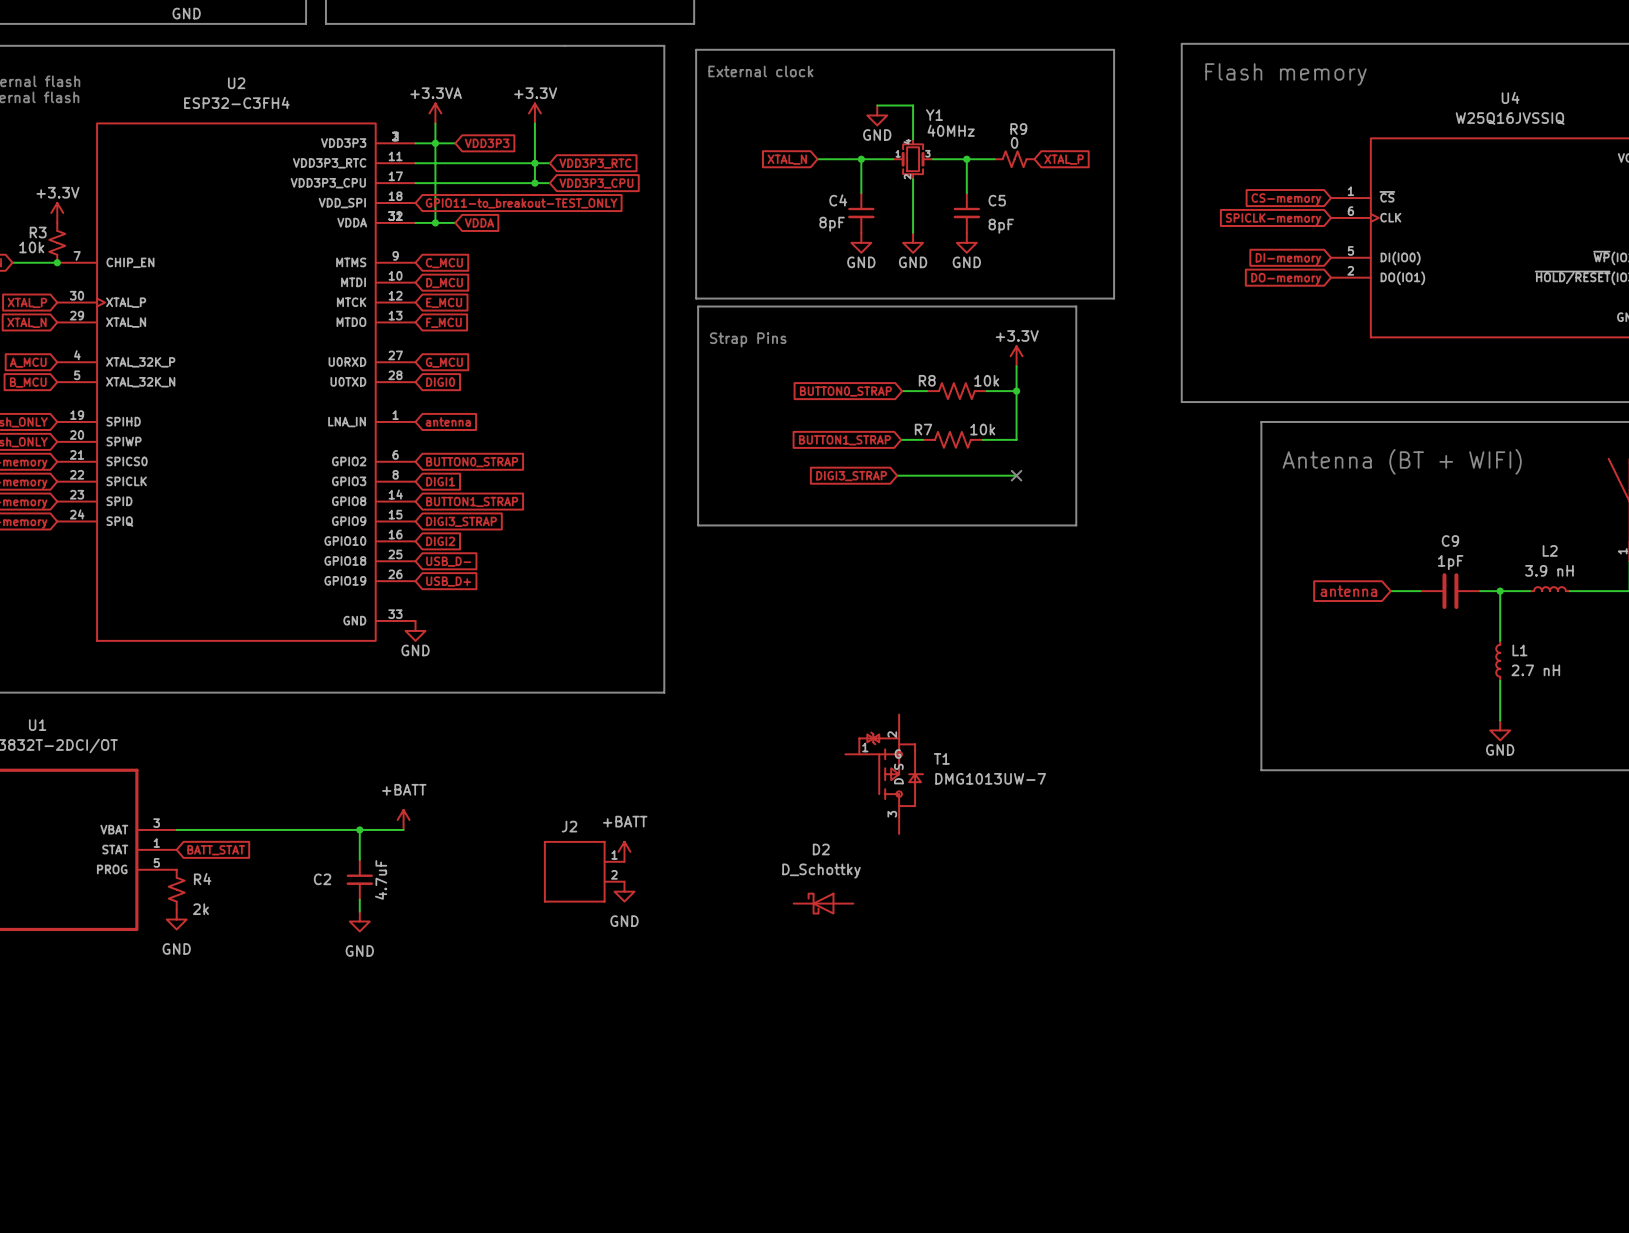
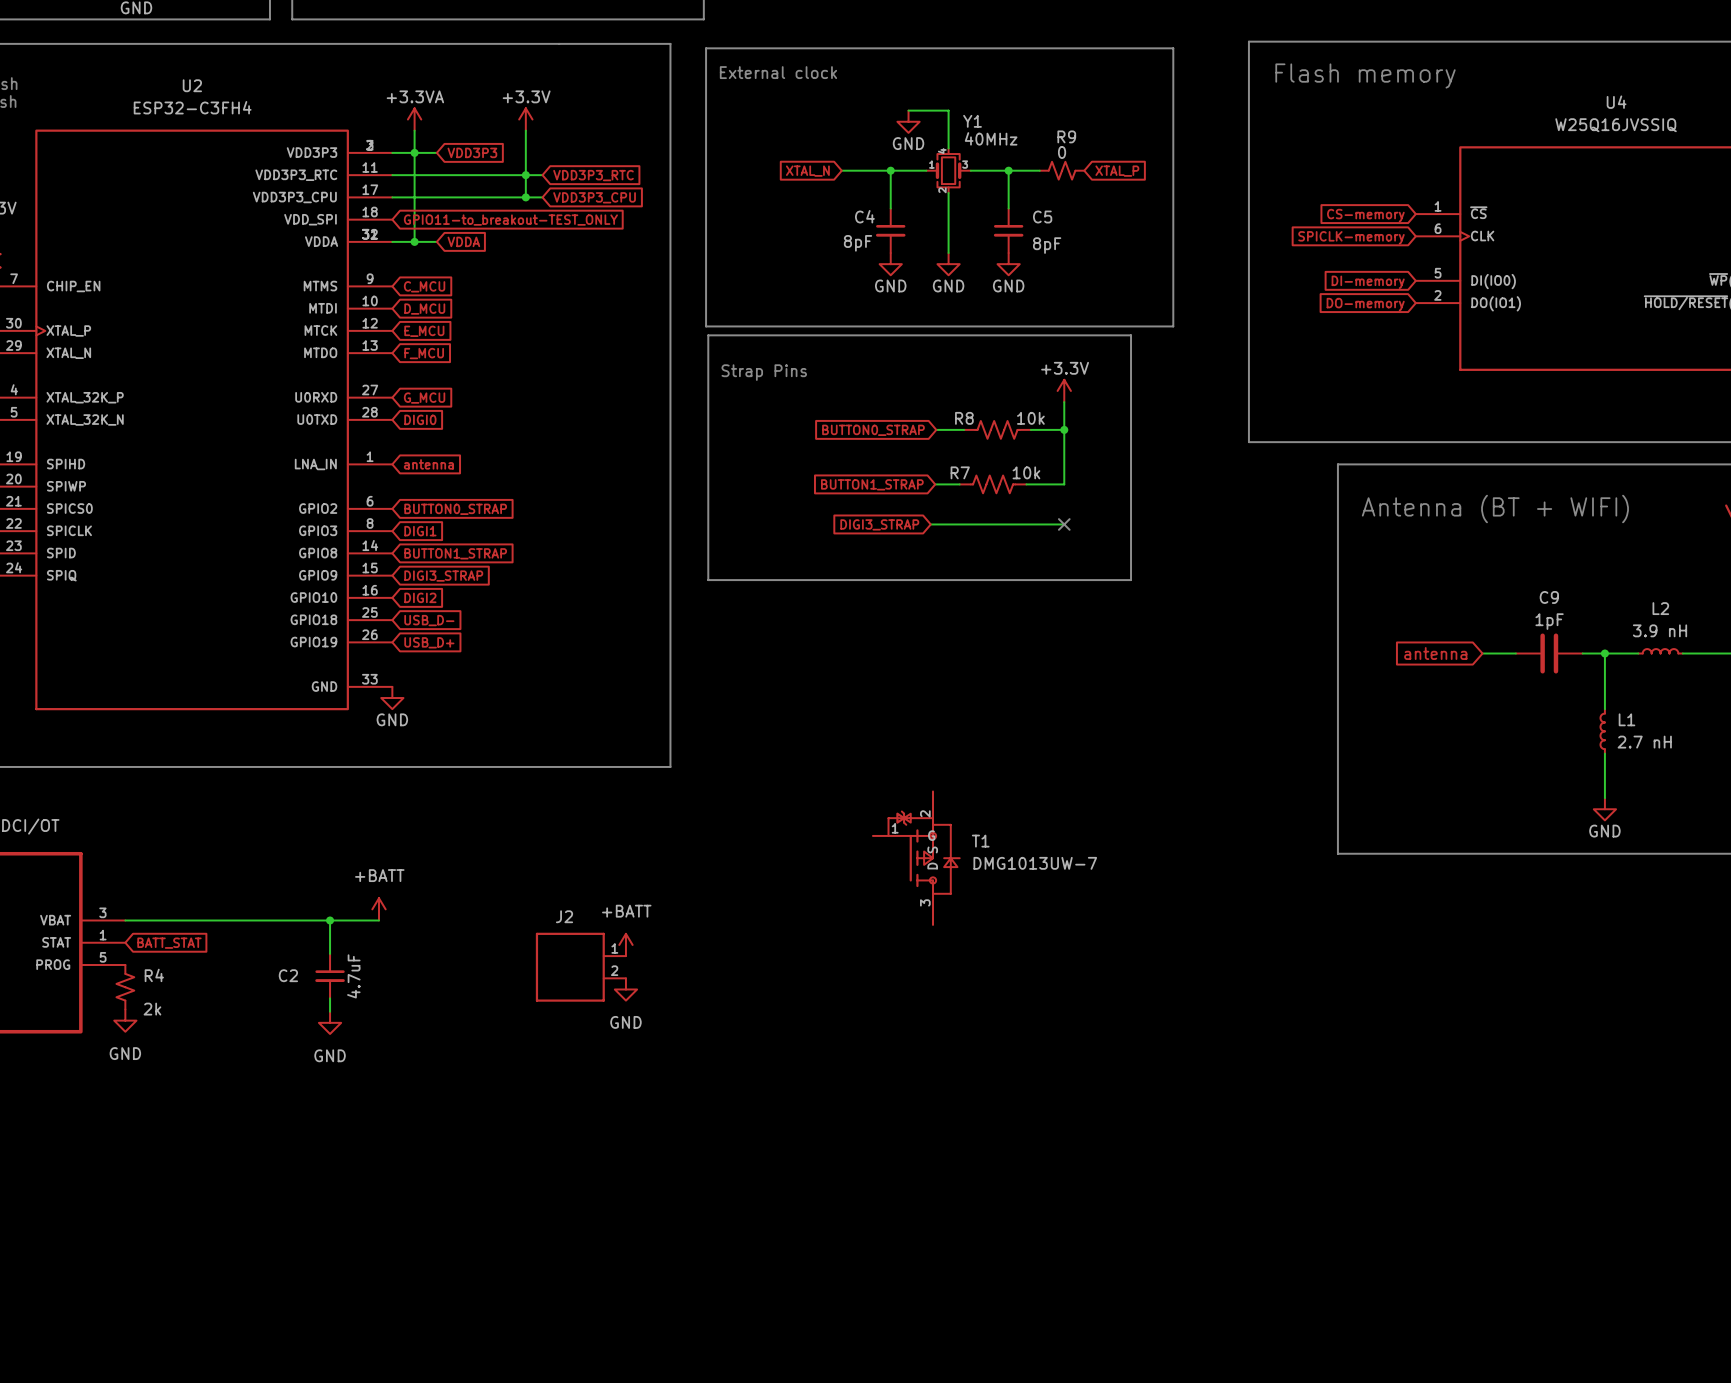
D2: D_Schottky (823, 903) -> none

